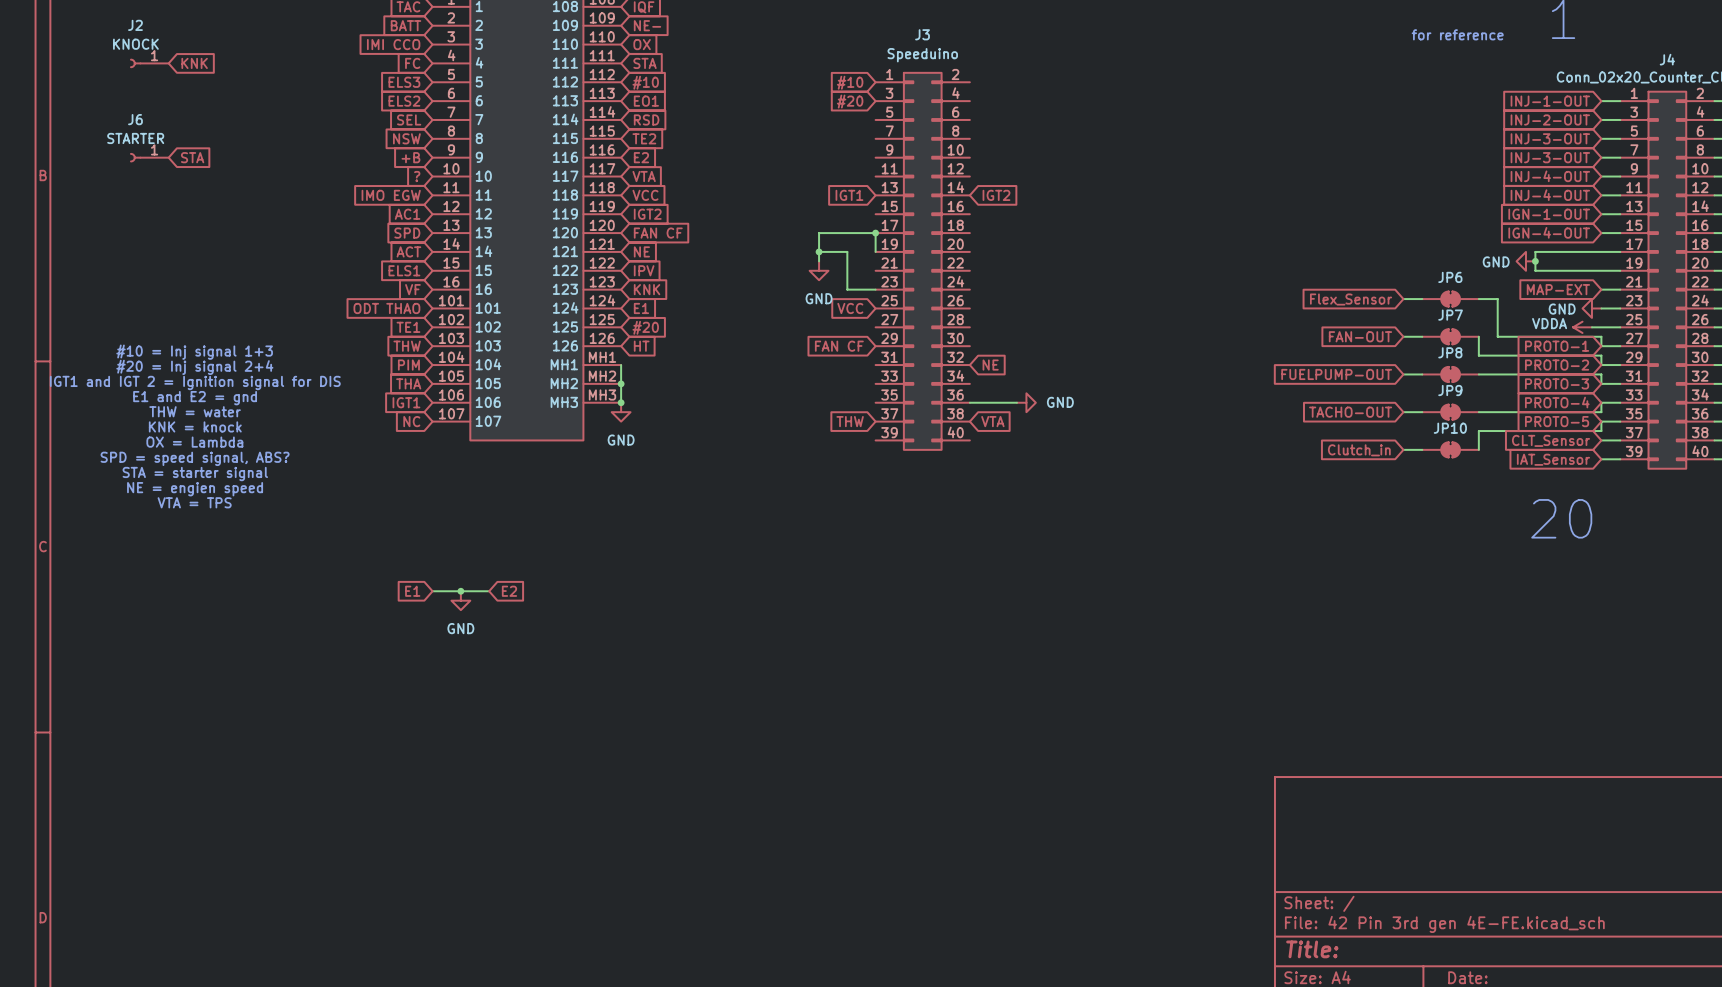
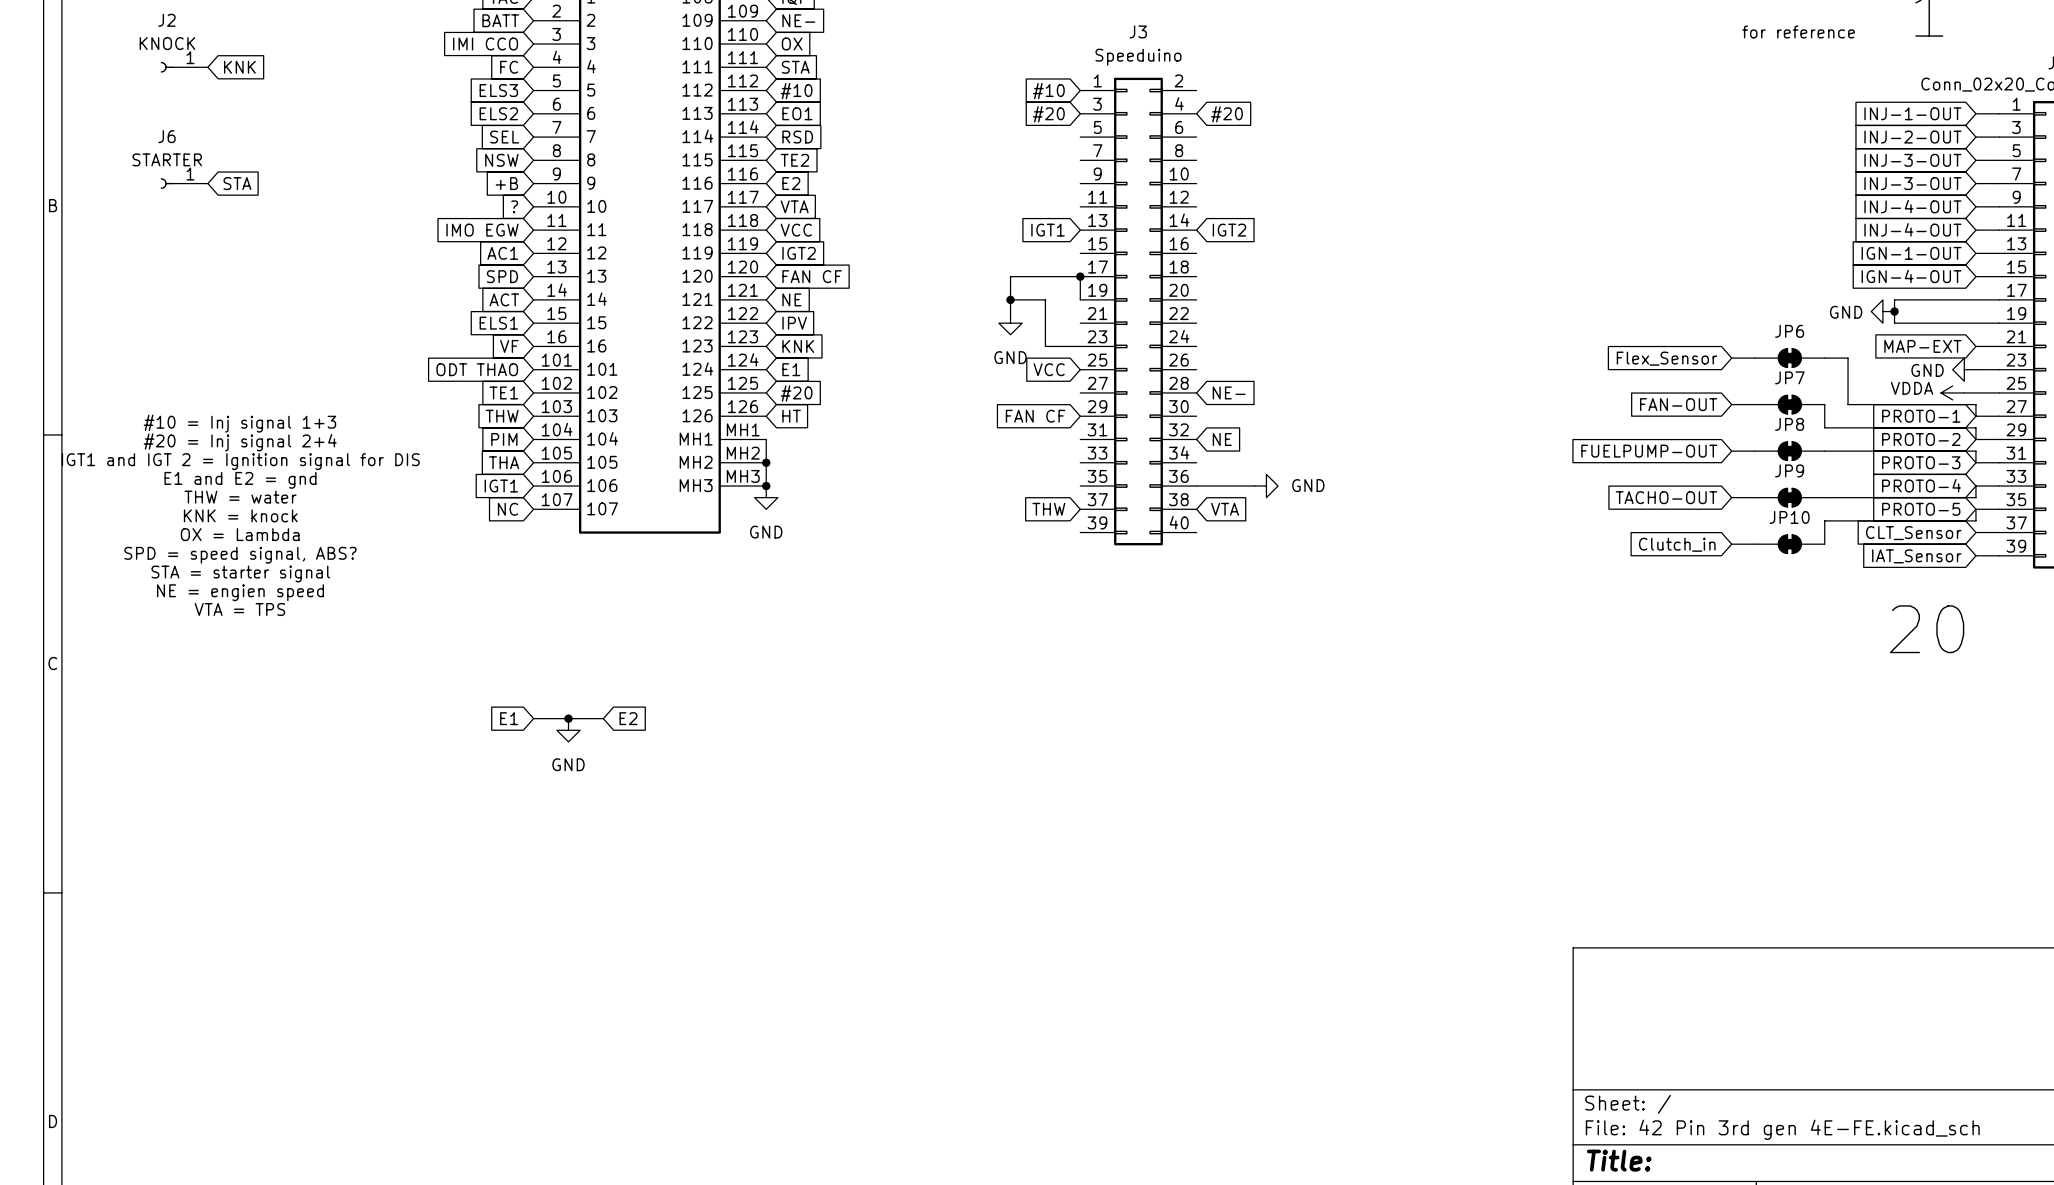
global label: none -> #20 (1226, 114)
global label: none -> NE- (1229, 392)

